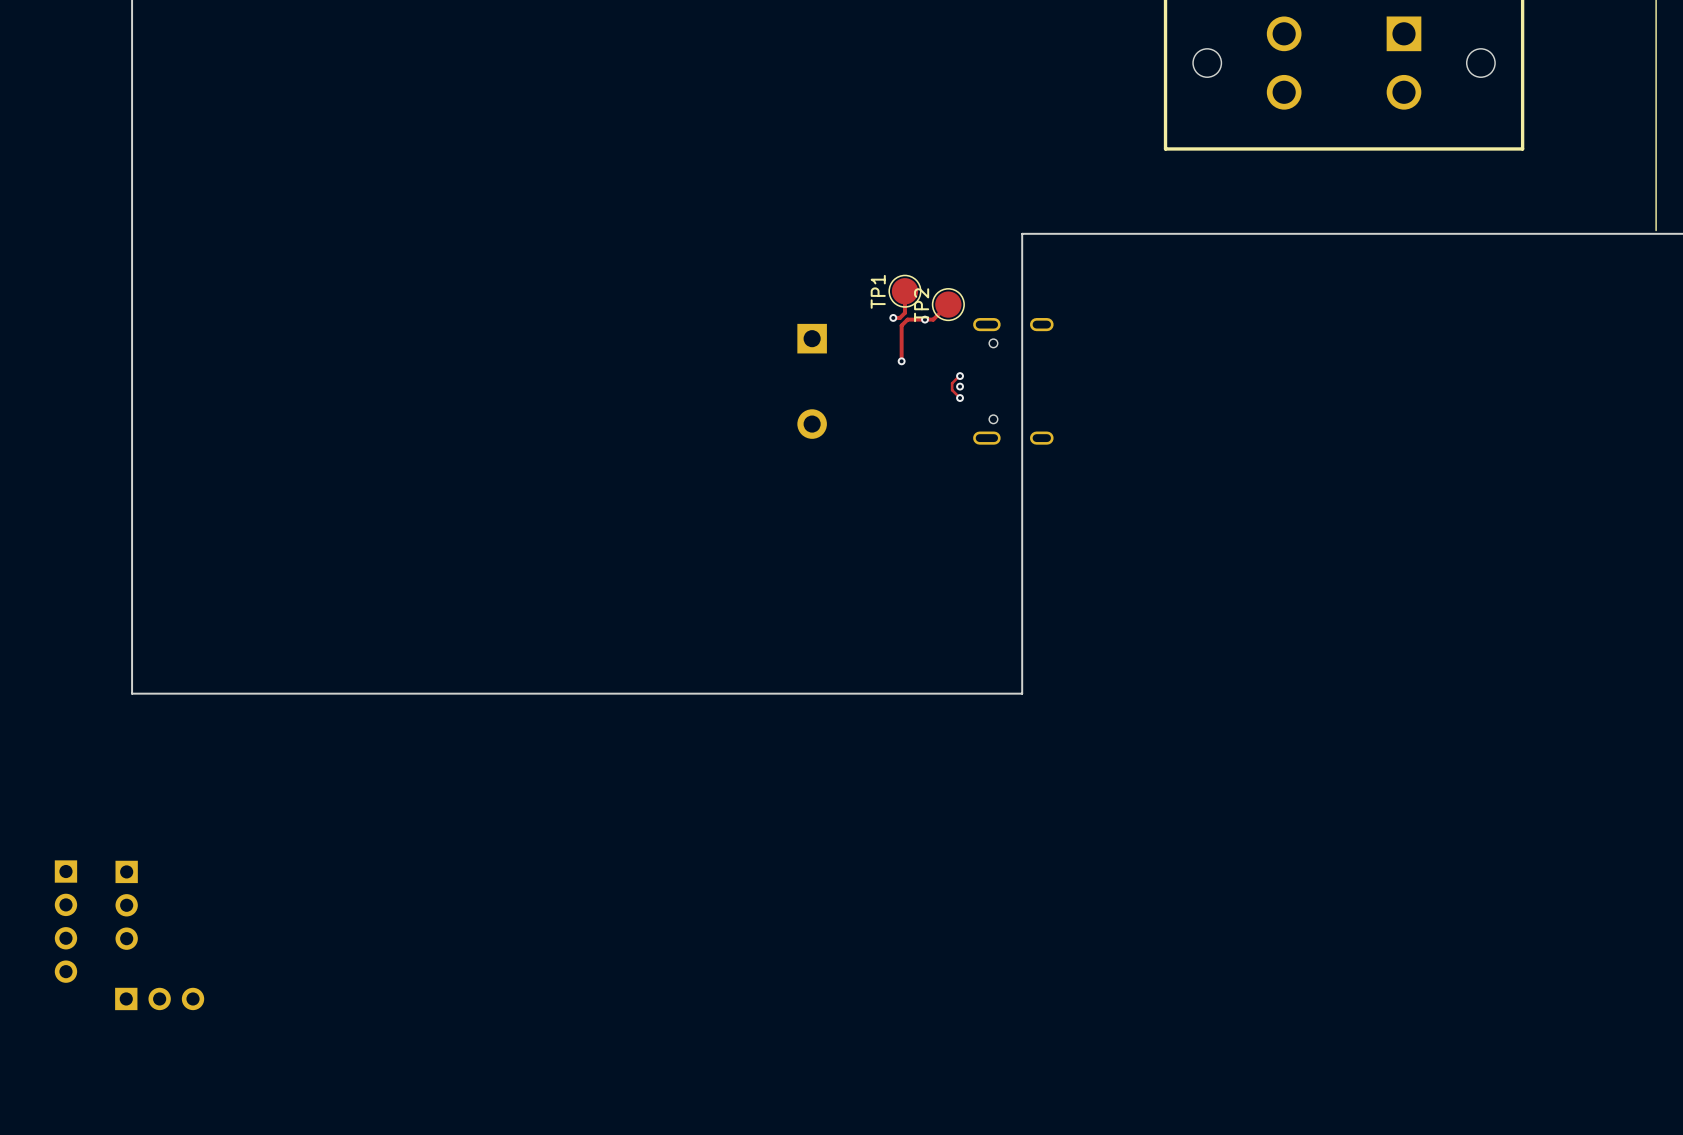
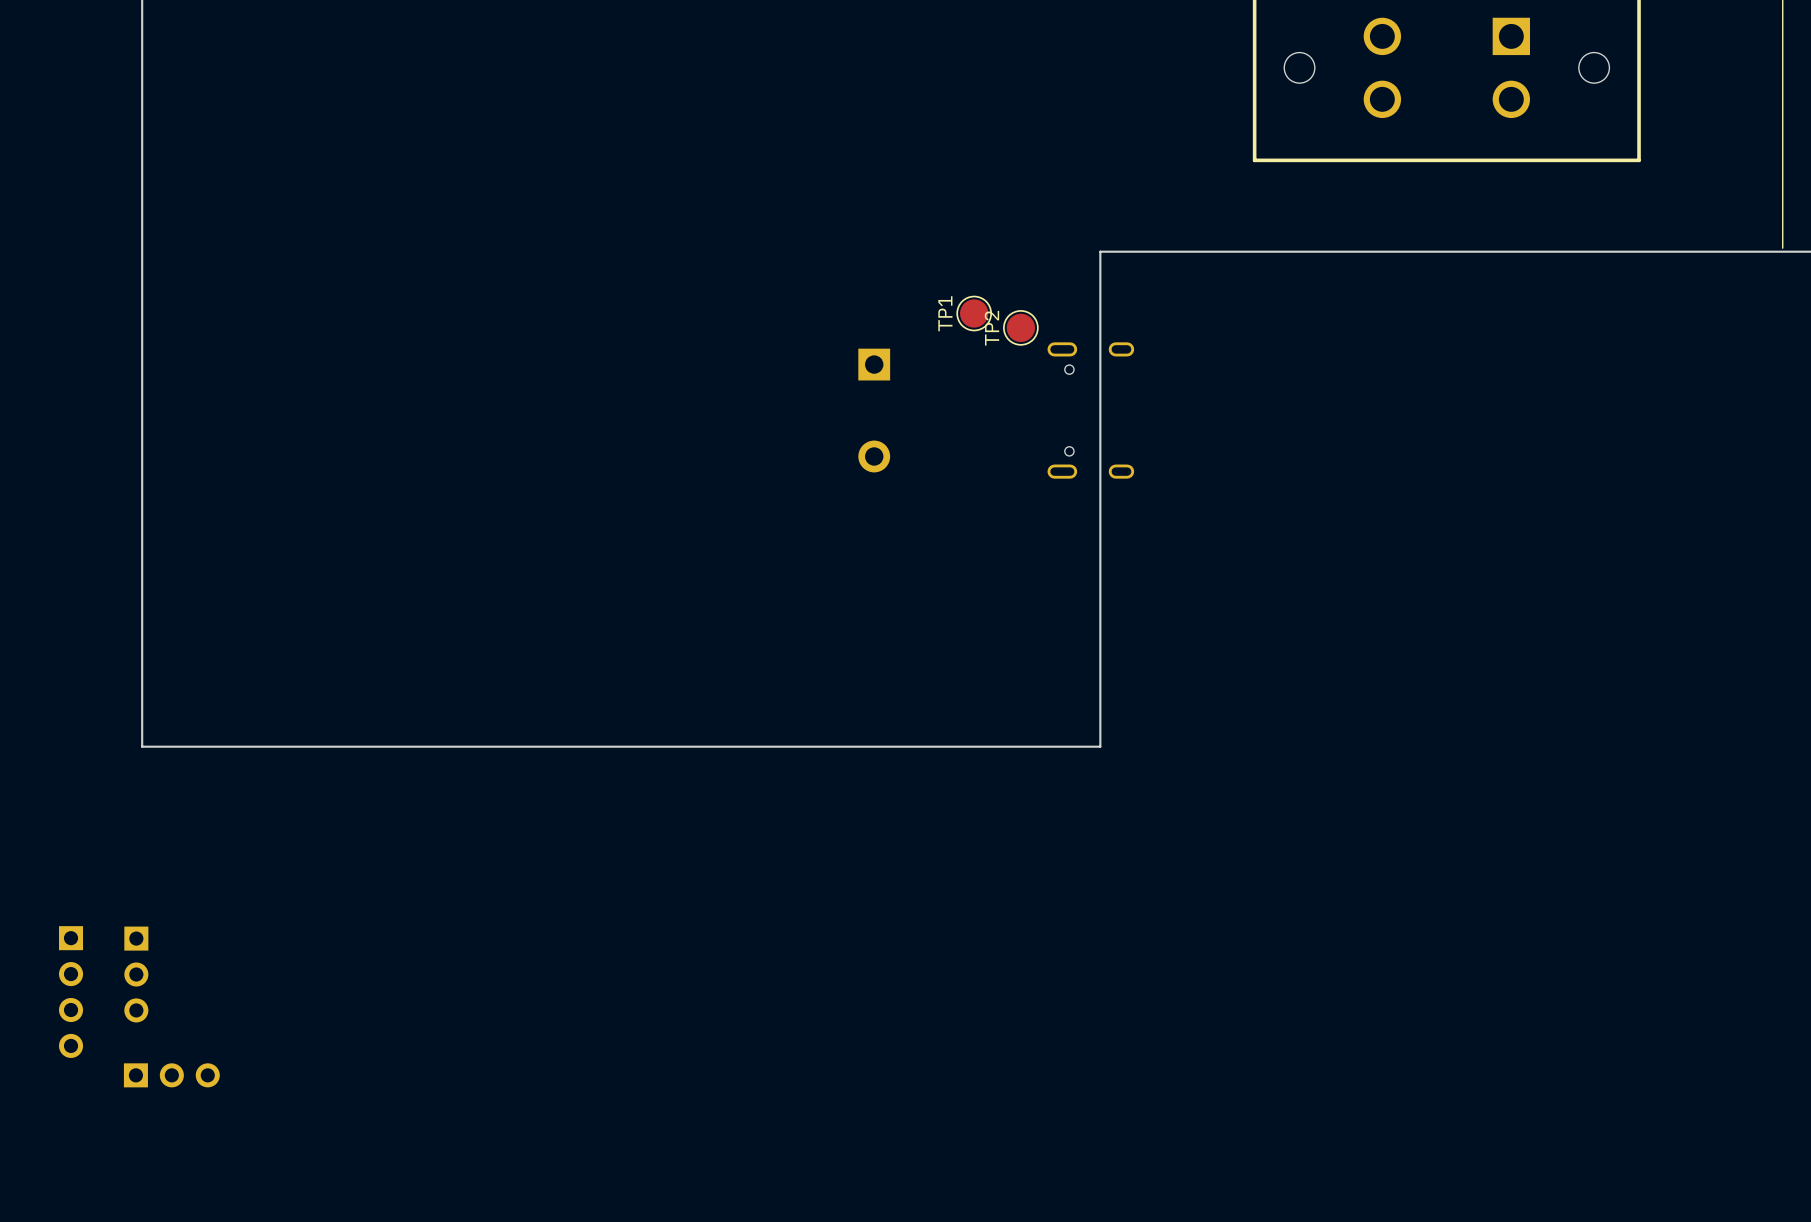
track: (904, 291) (904, 312) (899, 317) (893, 317) -> none
track: (948, 304) (933, 319) (907, 319) (901, 325) (901, 361) -> none
via: (893, 317) -> none
via: (925, 319) -> none
via: (901, 361) -> none
track: (960, 376) (952, 383) (952, 390) (960, 398) -> none
via: (960, 376) -> none
via: (960, 386) -> none
via: (960, 398) -> none

